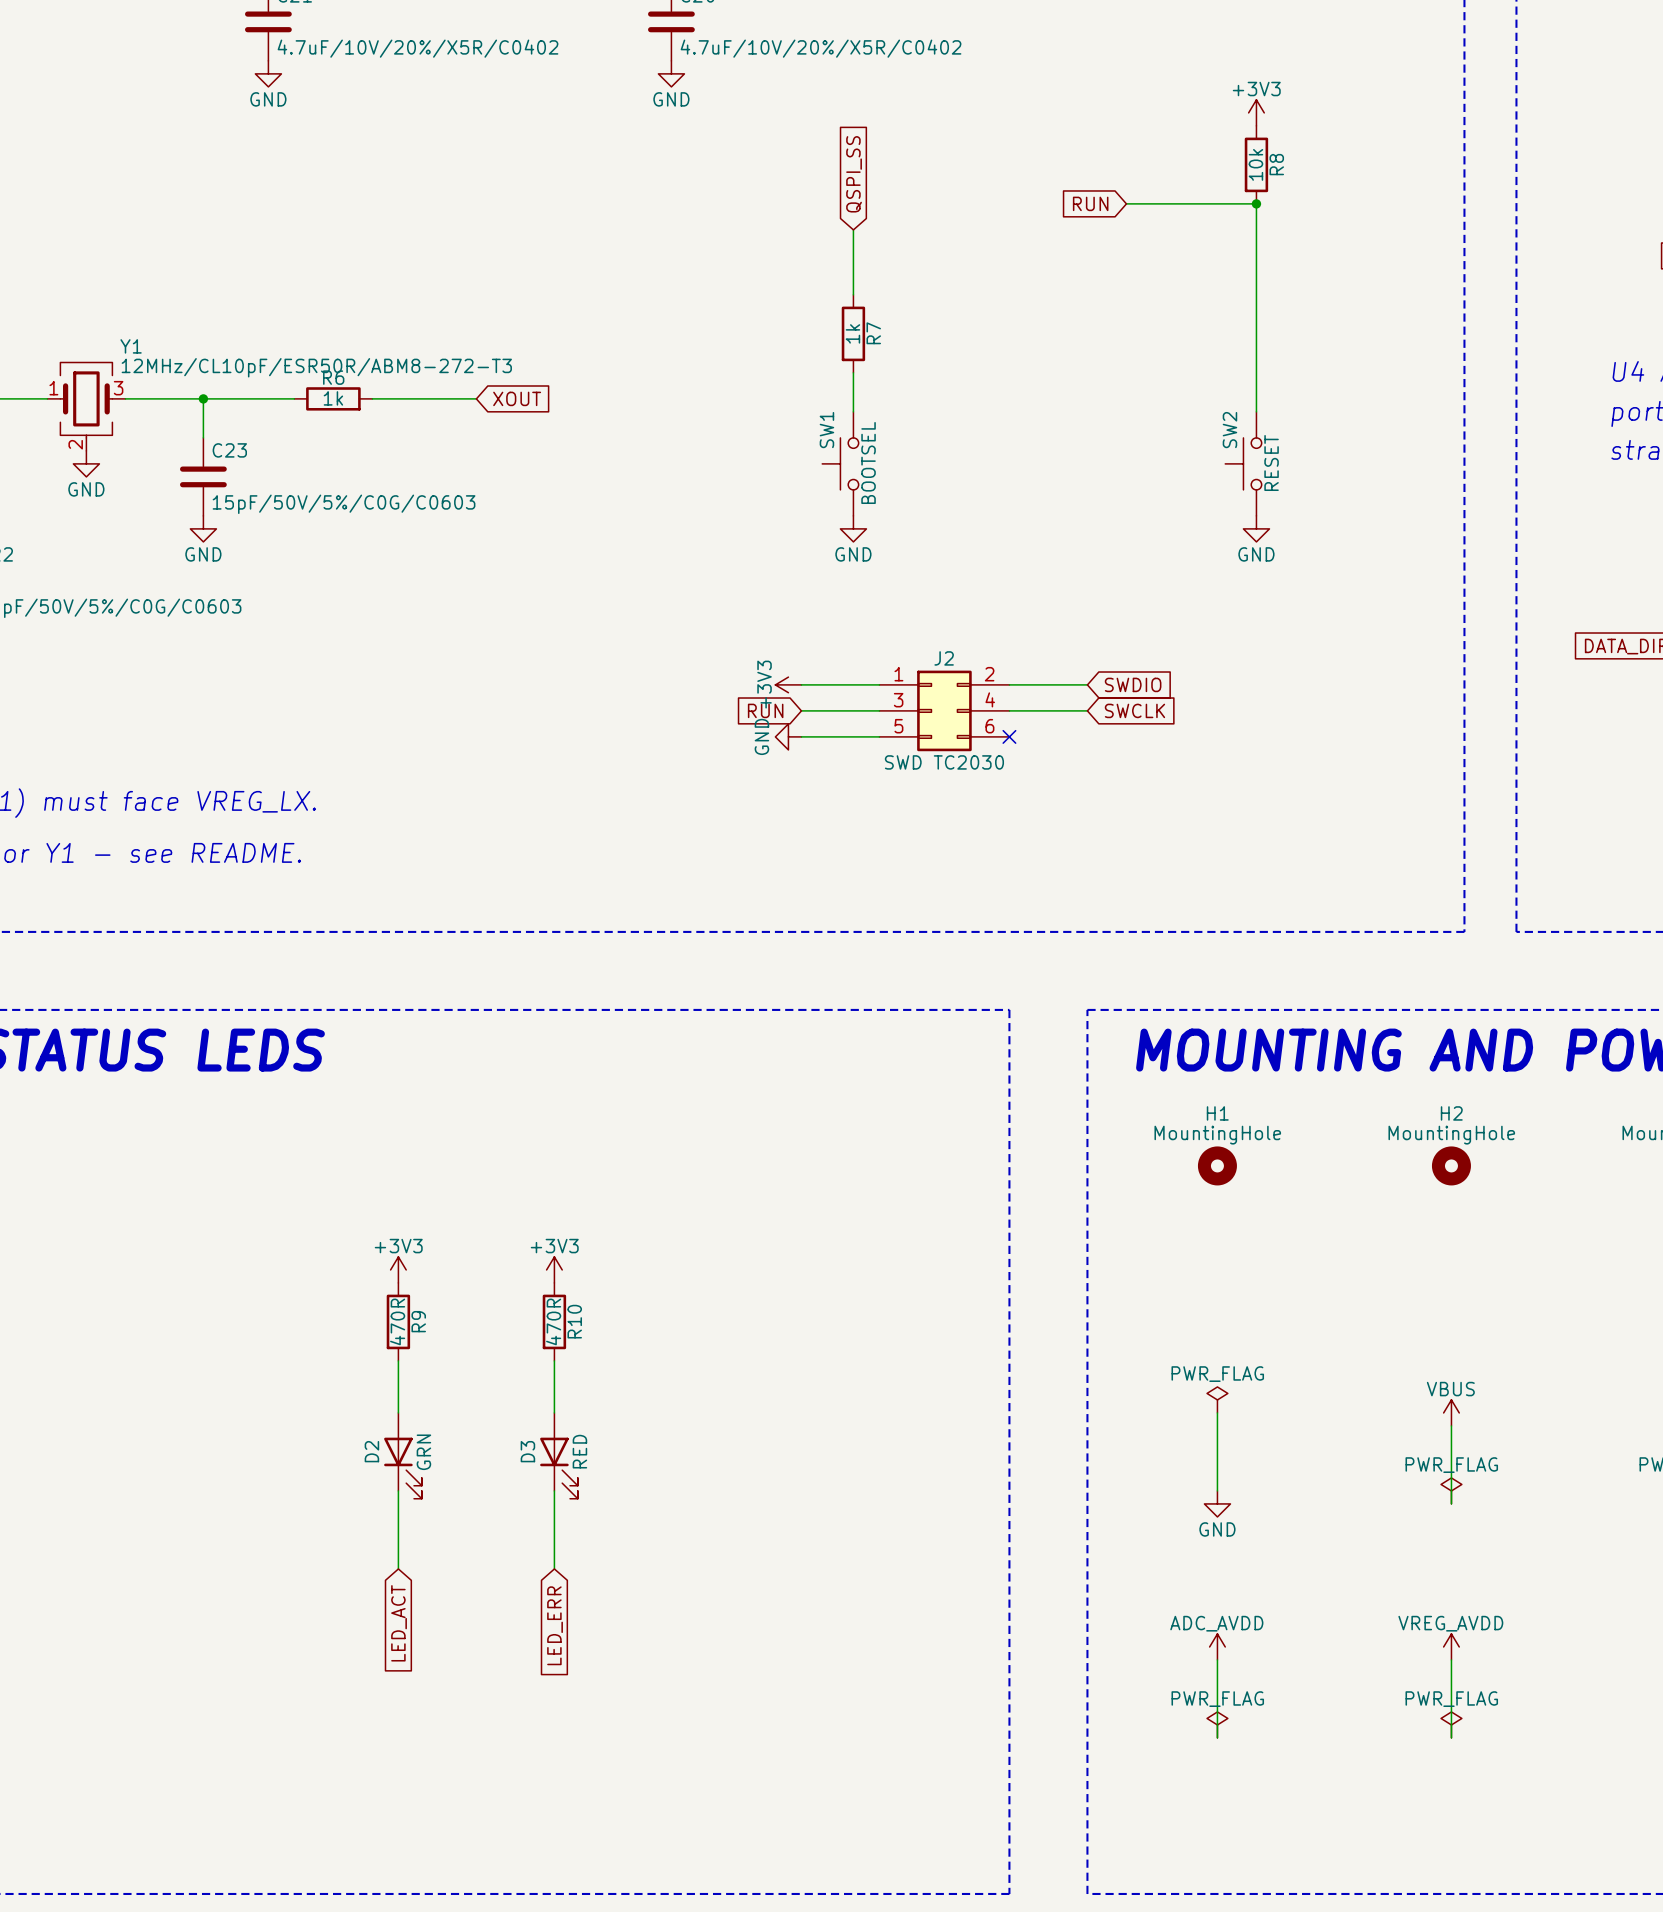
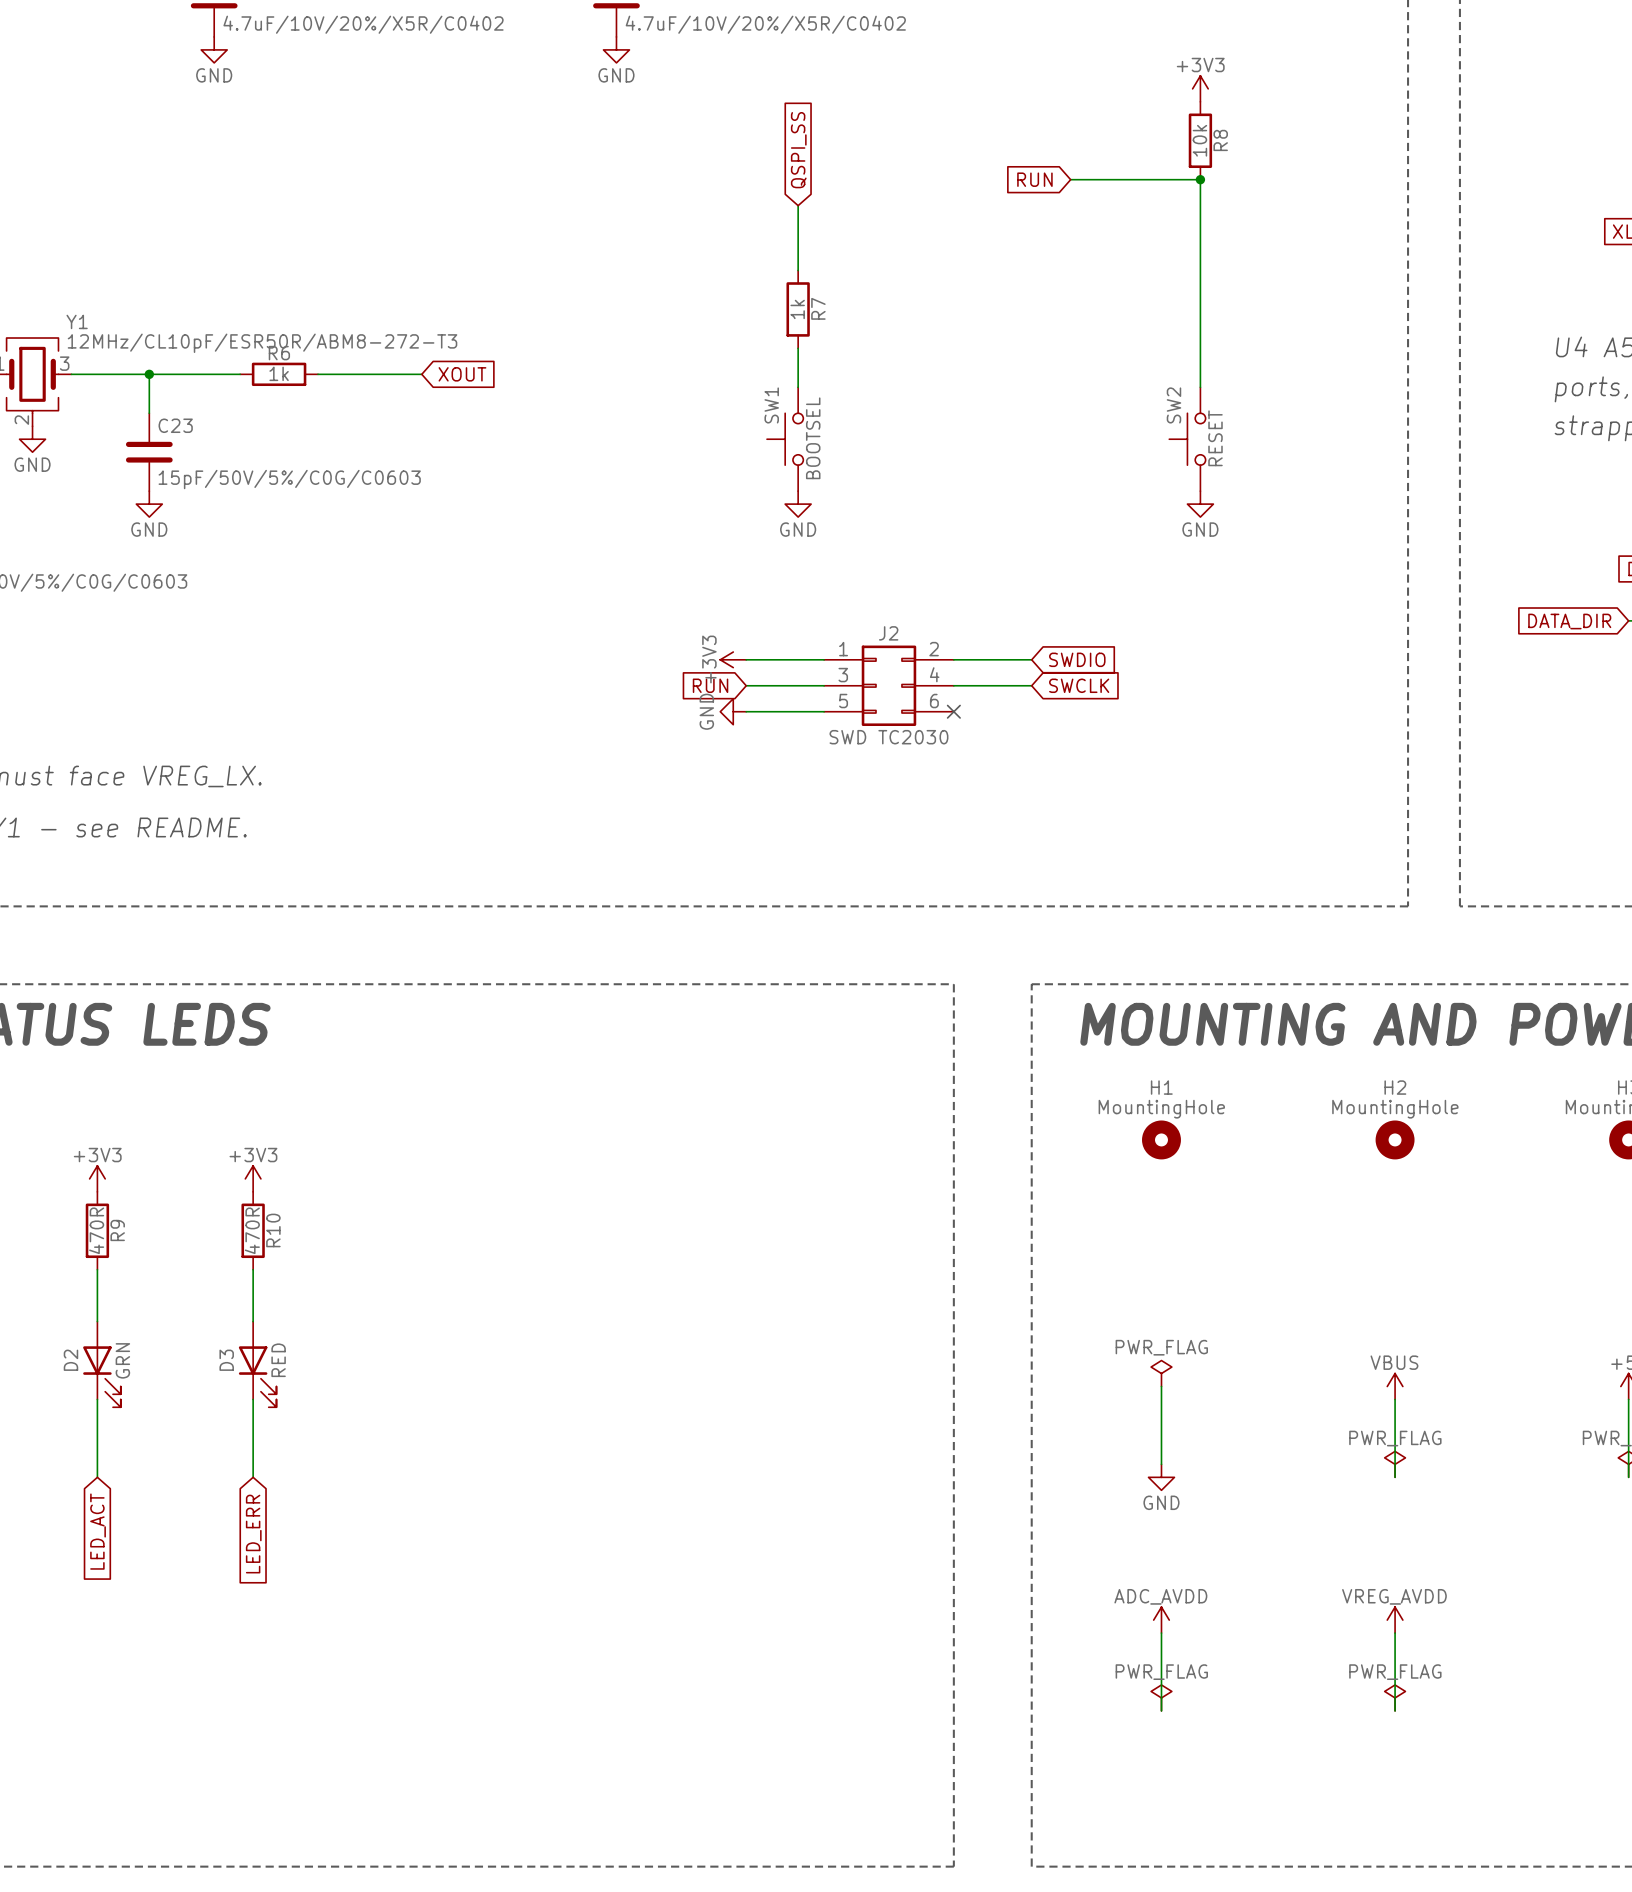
power symbol: none -> +3V3 (97, 1178)
power symbol position: +3V3 (398, 1269) -> +3V3 (253, 1178)
power symbol: +3V3 (554, 1269) -> none
R9 position: (398, 1321) -> (97, 1230)
R10 position: (554, 1321) -> (253, 1230)
wire: (398, 1360) (398, 1412) -> (97, 1269) (97, 1321)
wire: (554, 1360) (554, 1412) -> (253, 1269) (253, 1321)
D2 position: (402, 1455) -> (101, 1364)
D3 position: (558, 1455) -> (257, 1364)
wire: (398, 1490) (398, 1568) -> (97, 1399) (97, 1477)
wire: (554, 1490) (554, 1568) -> (253, 1399) (253, 1477)
global label position: LED_ACT (399, 1623) -> LED_ACT (98, 1531)
global label position: LED_ERR (555, 1625) -> LED_ERR (253, 1534)

